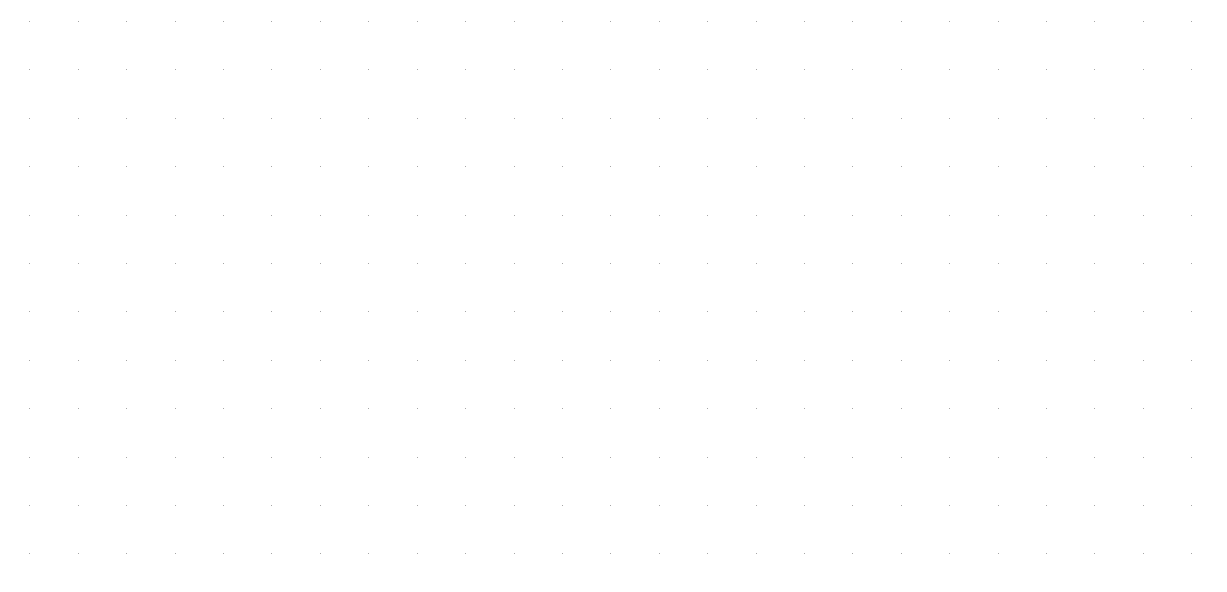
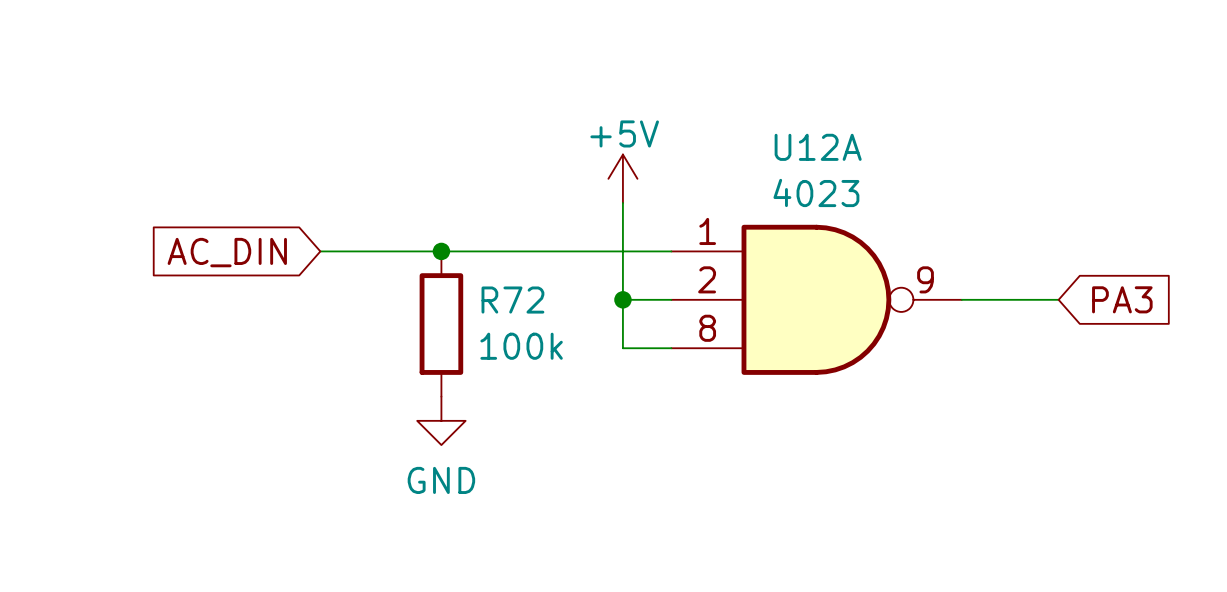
power symbol: none -> +5V (622, 178)
wire: none -> (622, 203) (622, 348) (671, 348)
wire: none -> (320, 251) (671, 251)
junction: none -> (441, 251)
global label: none -> AC_DIN (227, 252)
wire: none -> (622, 299) (671, 299)
junction: none -> (622, 299)
U12A: none -> 4023 (816, 299)
wire: none -> (961, 299) (1058, 299)
global label: none -> PA3 (1122, 299)
R72: none -> 100k (441, 324)
power symbol: none -> GND (441, 420)

